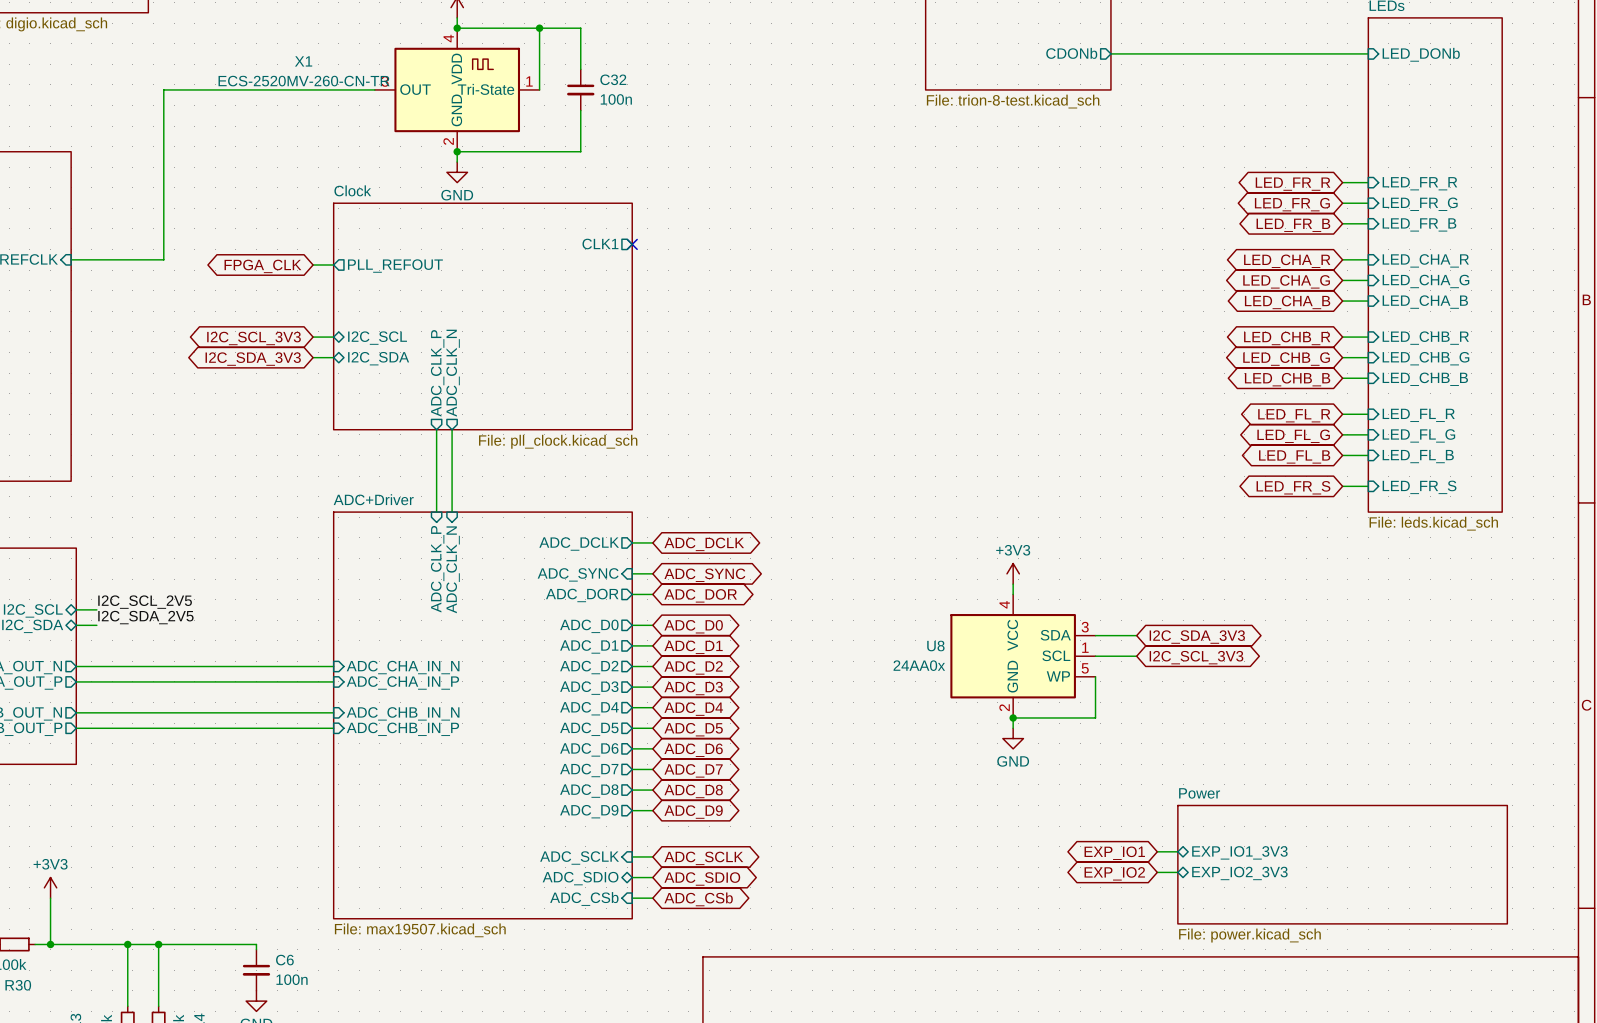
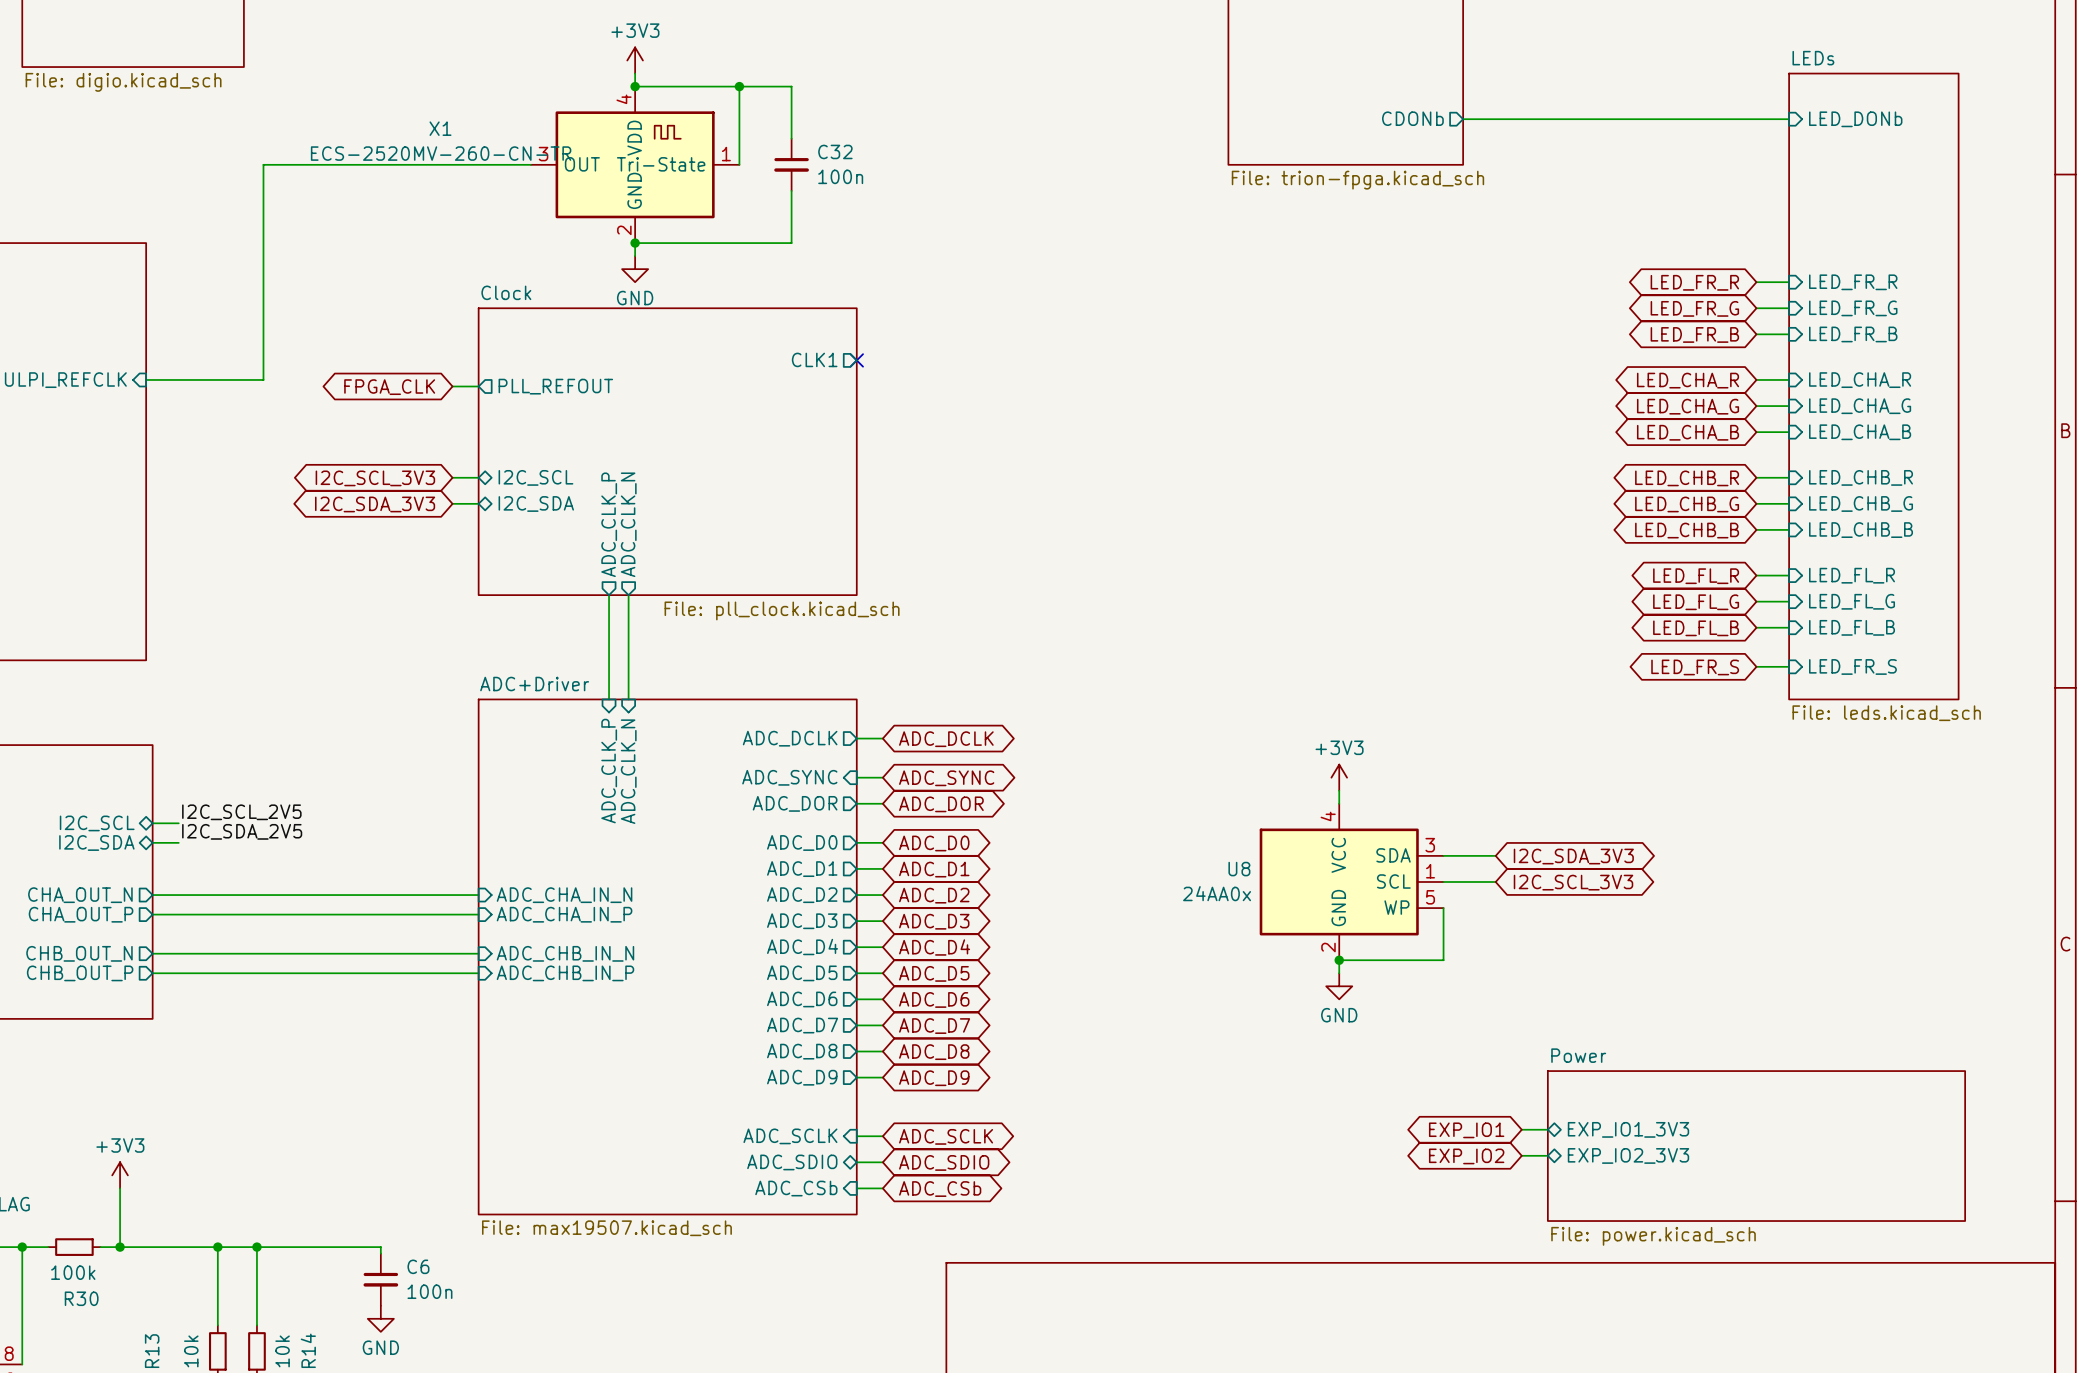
sheet value: File: trion-8-test.kicad_sch (1013, 101) -> File: trion-fpga.kicad_sch (1357, 180)

